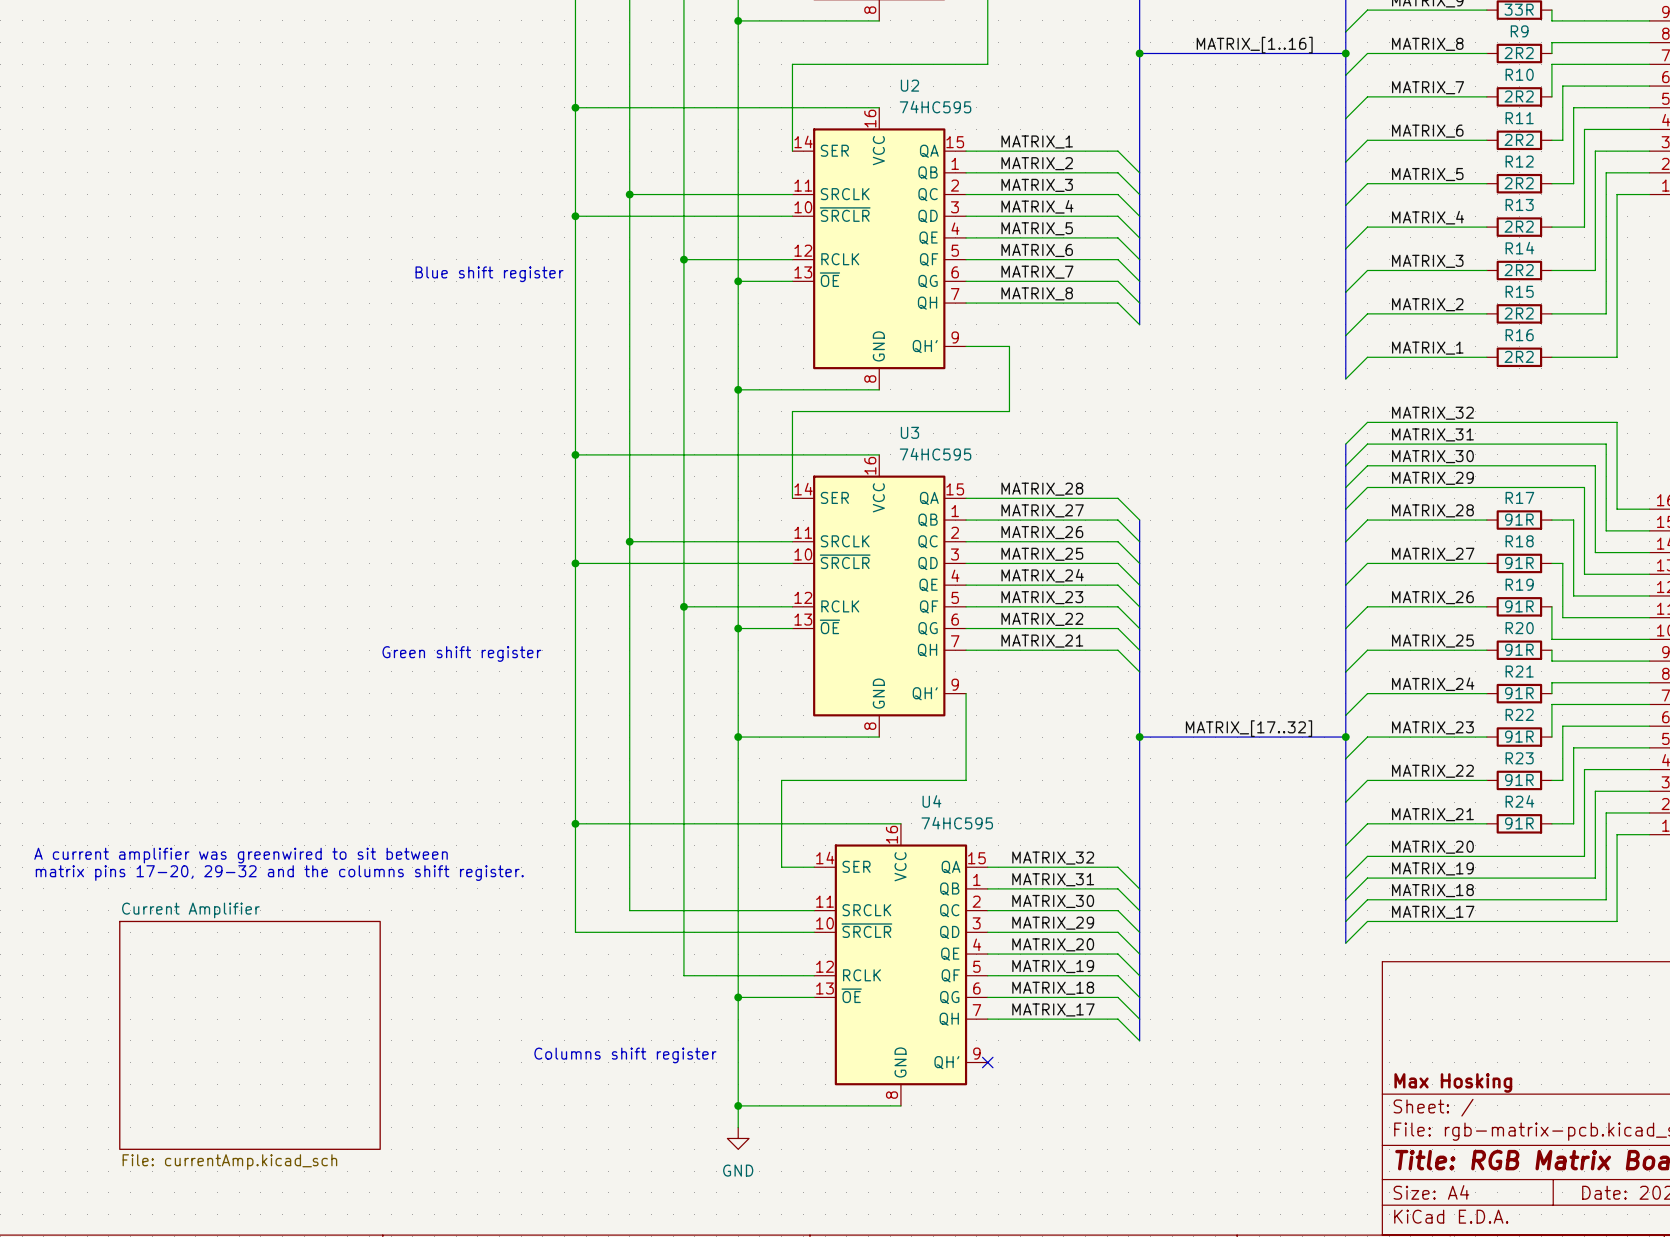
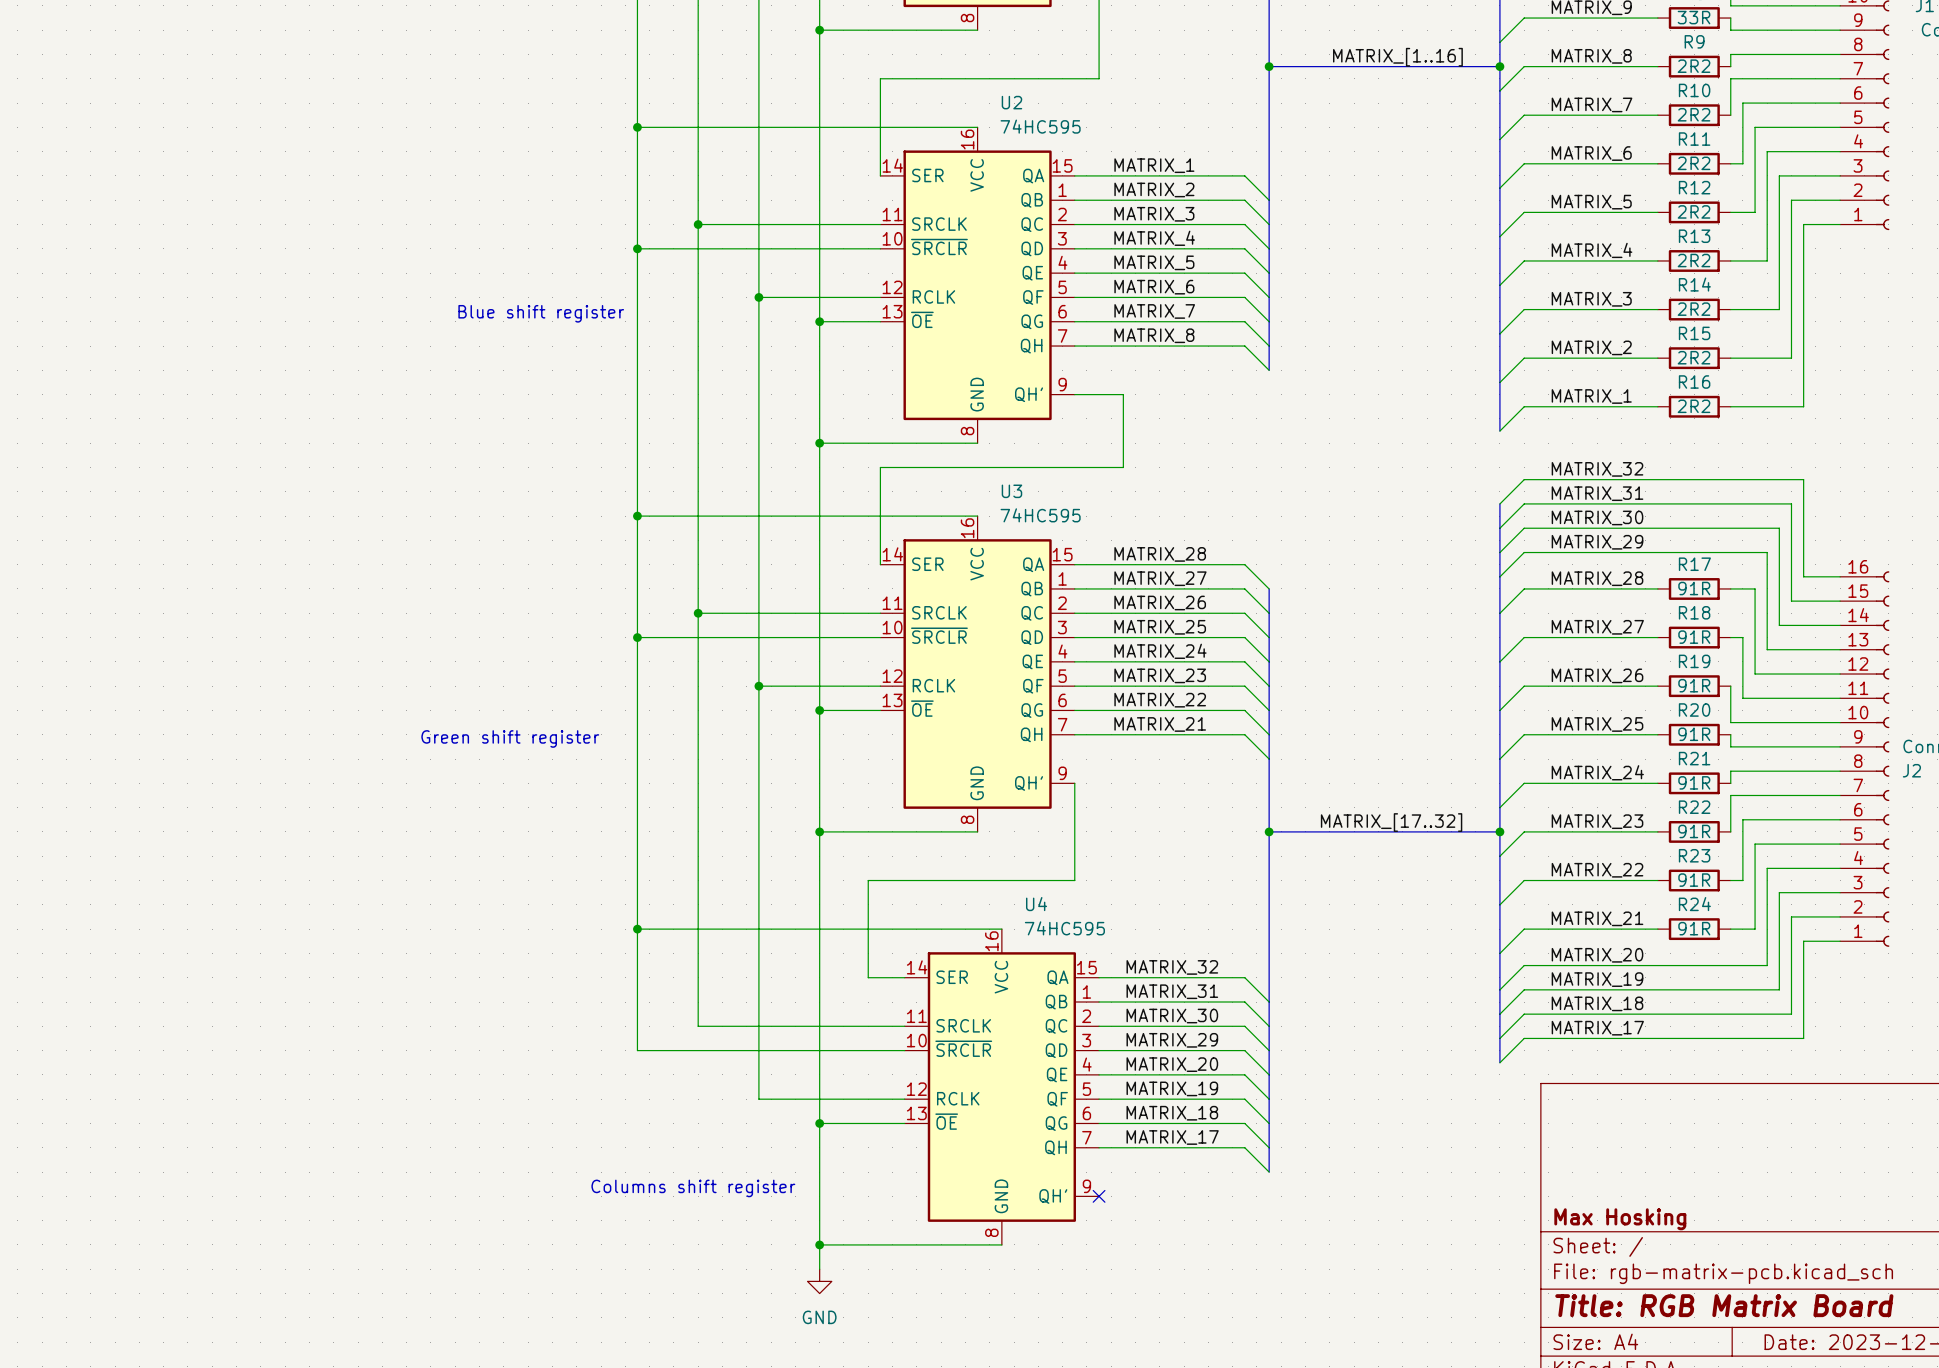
text: A current amplifier was greenwired to sit between (241, 855) -> none
text: matrix pins 17-20, 29-32 and the columns shift register. (279, 873) -> none
sheet Current Amplifier: File: currentAmp.kicad_sch (249, 1035) -> none

